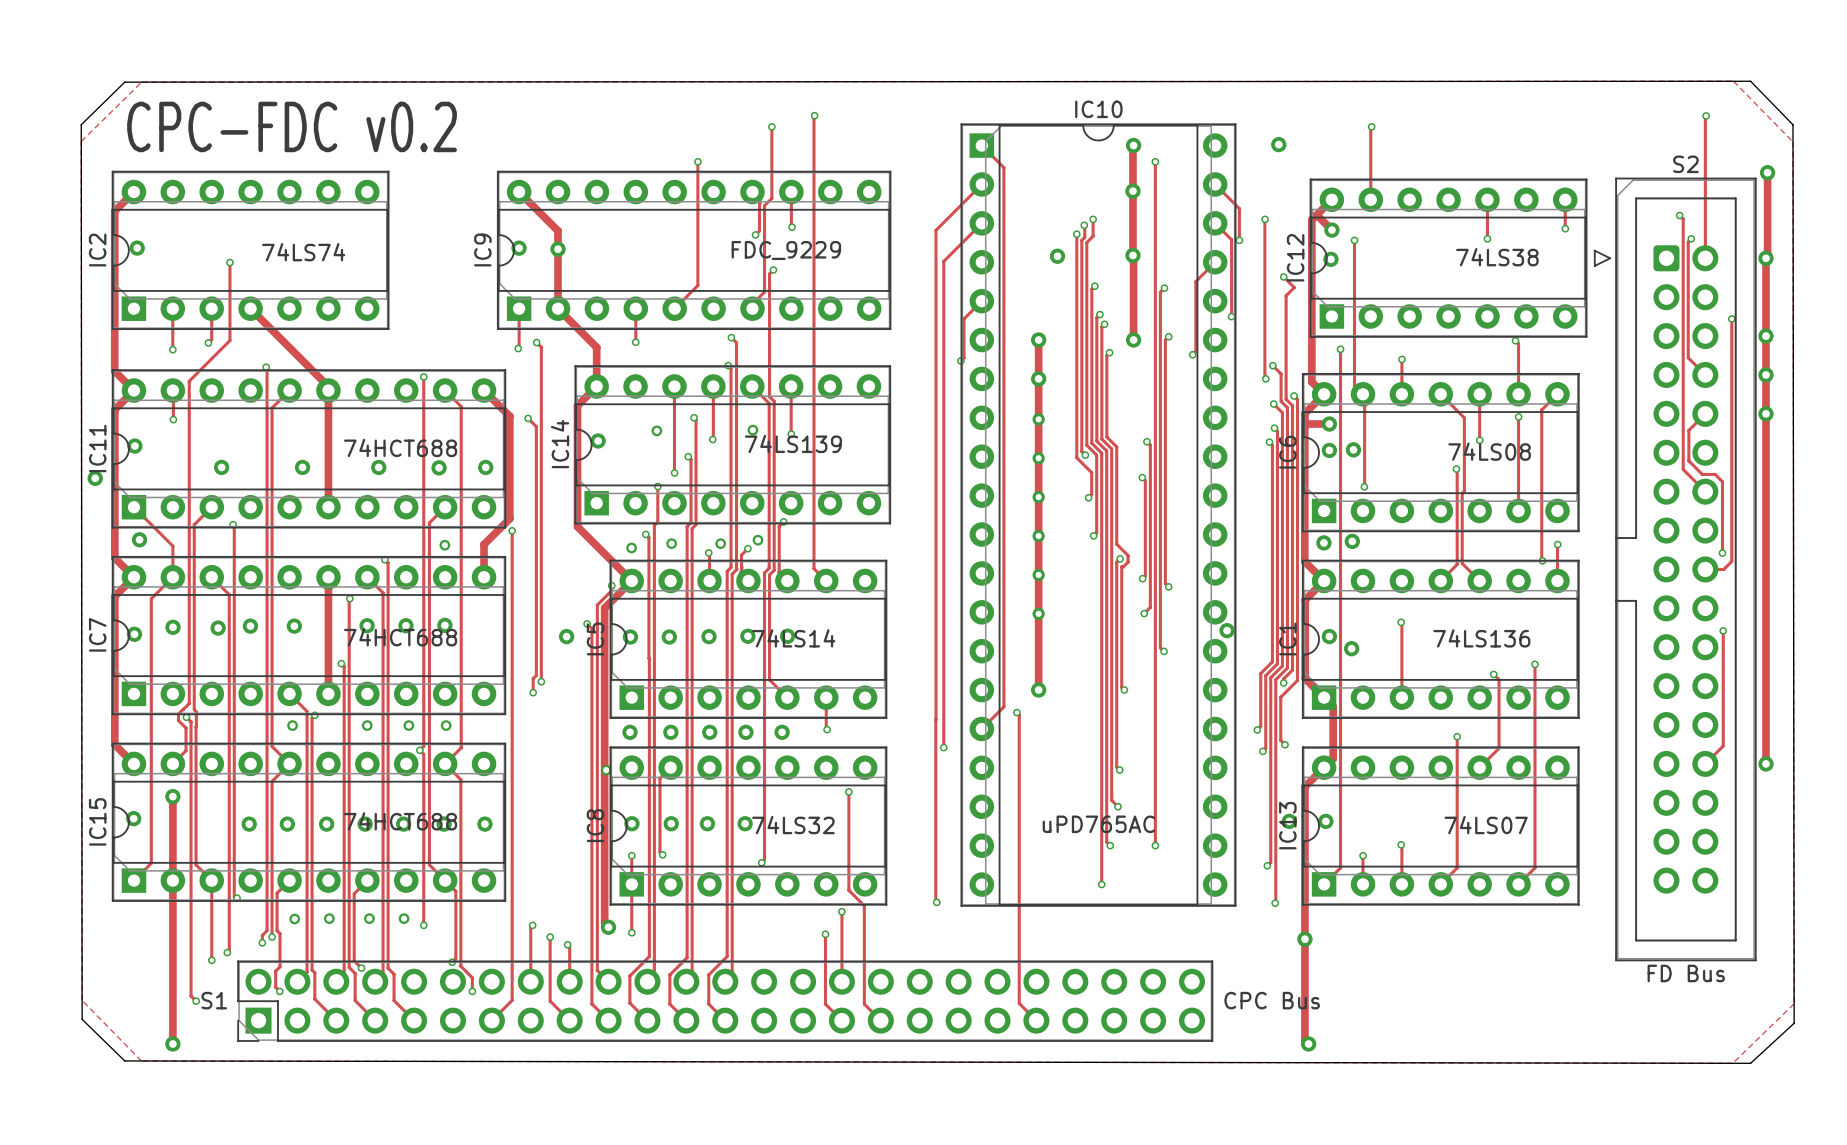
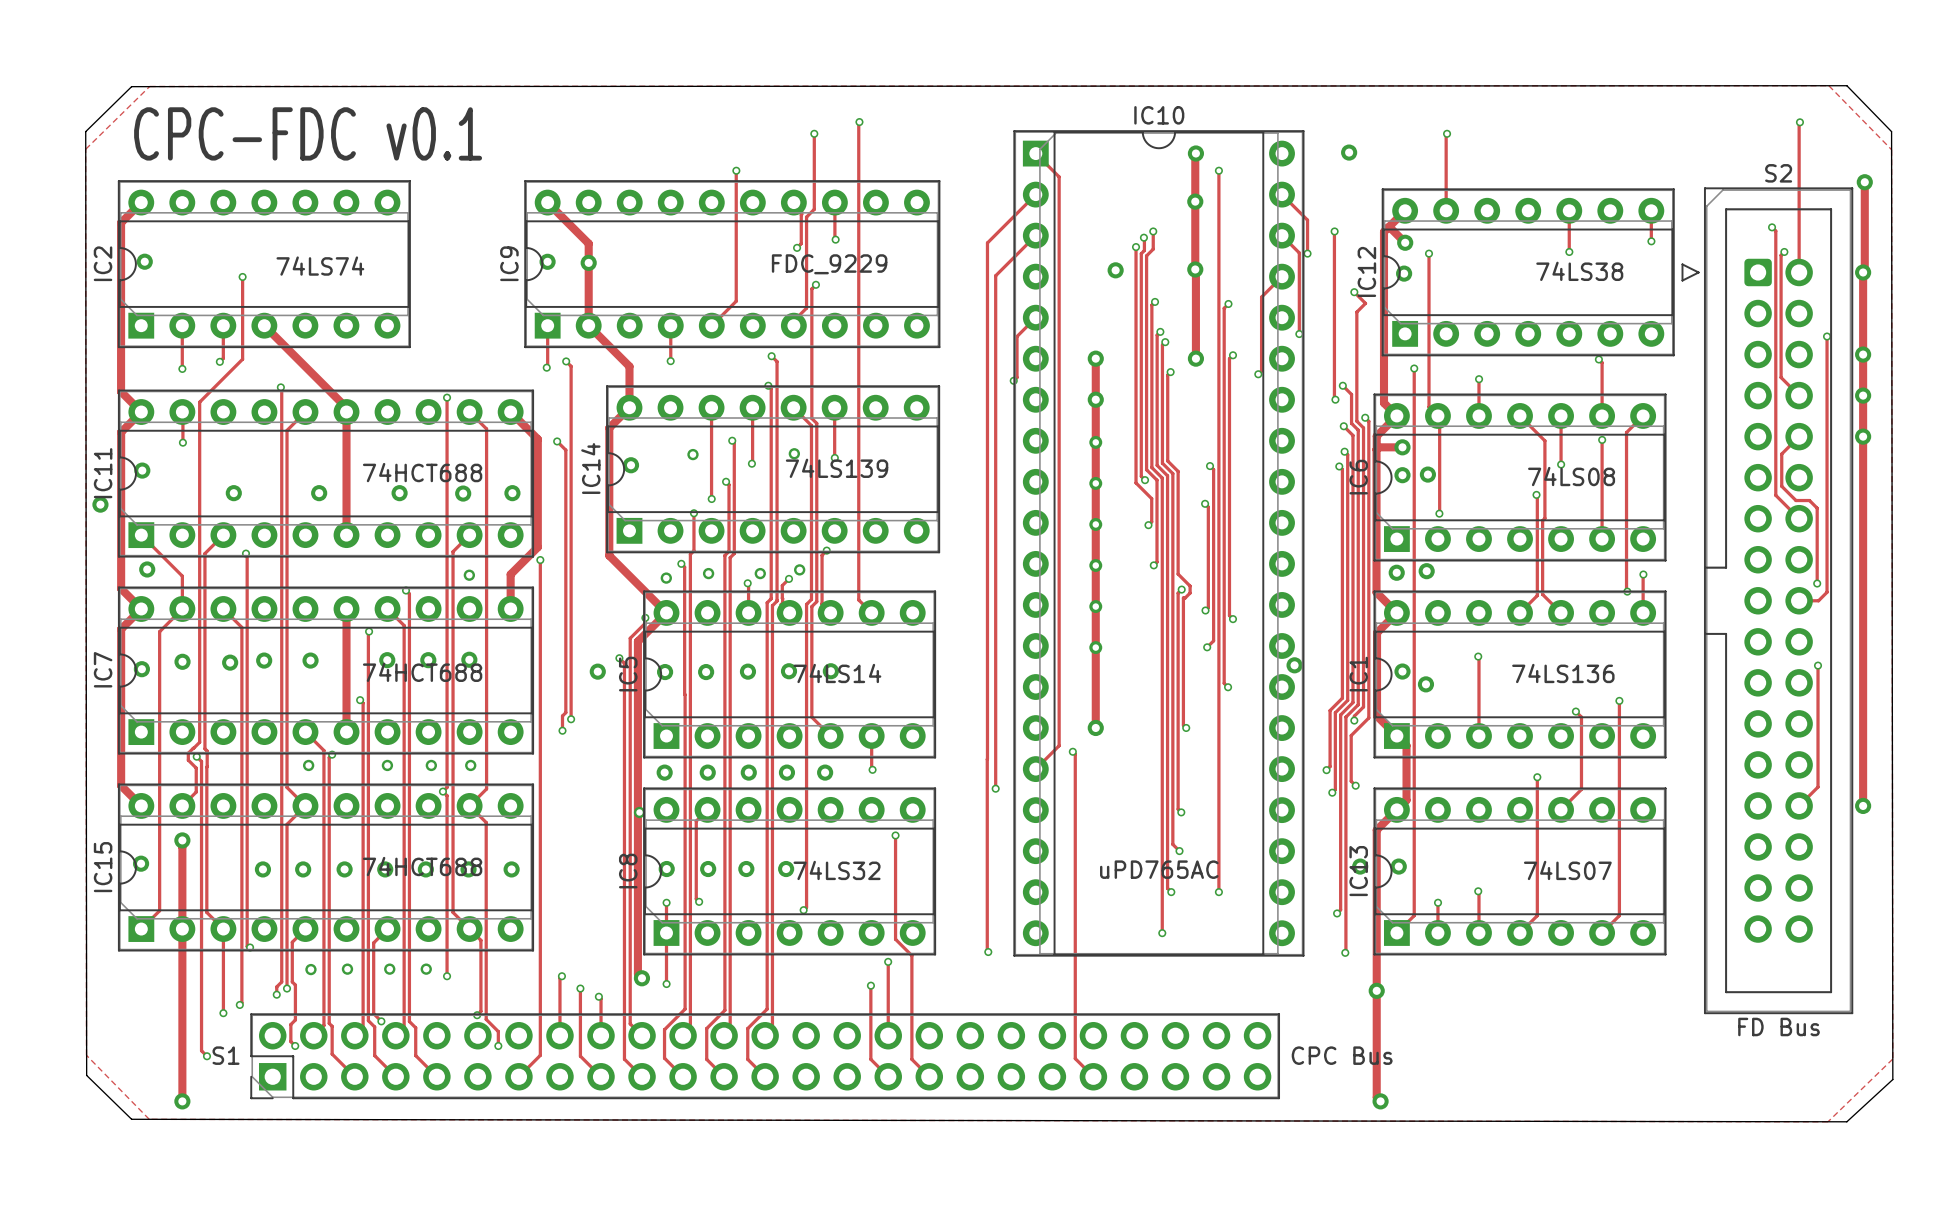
text: CPC-FDC v0.2 (292, 126) -> CPC-FDC v0.1 (308, 133)

